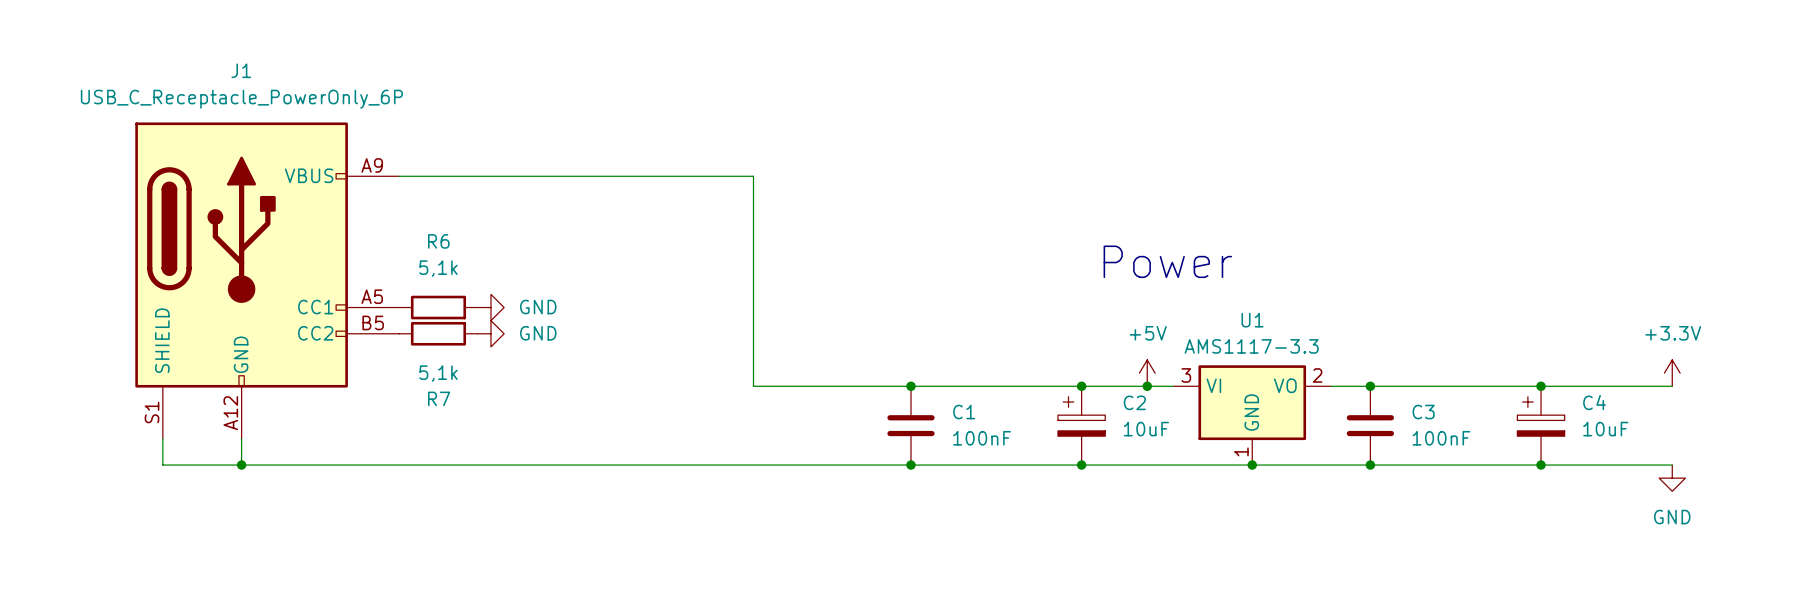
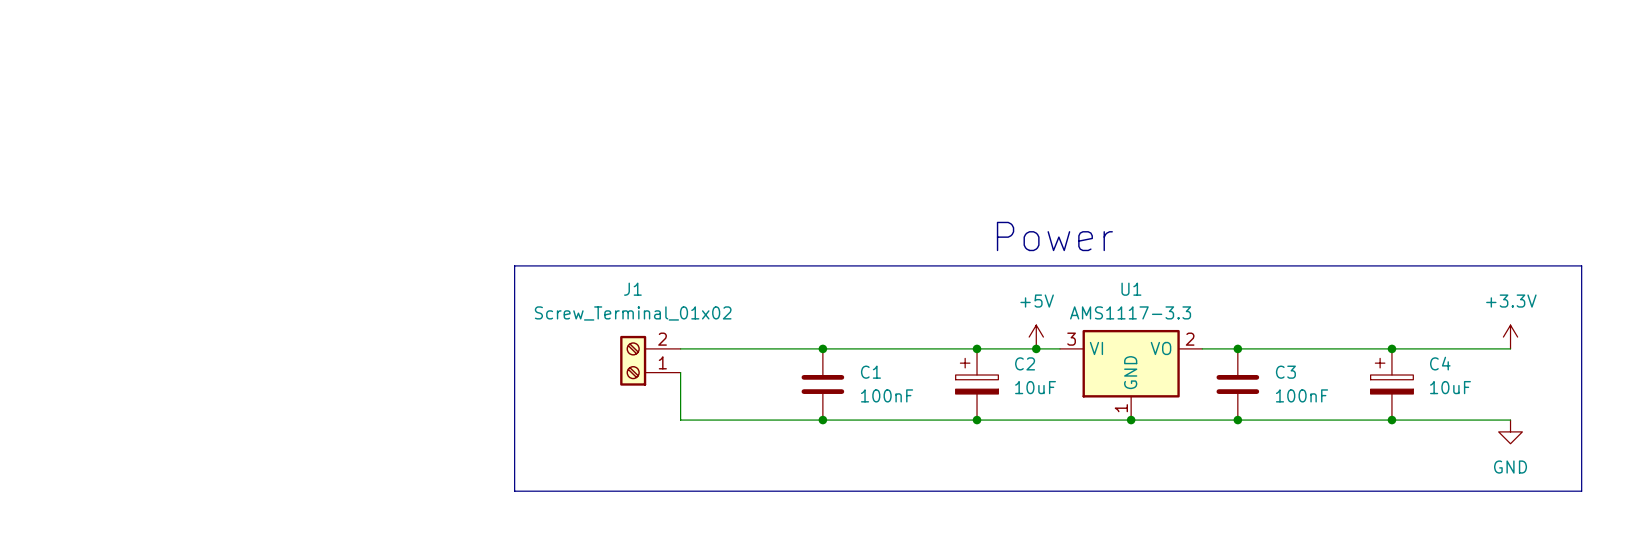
J1 name position: J1 (241, 70) -> J1 (632, 289)
J1 value: USB_C_Receptacle_PowerOnly_6P (241, 99) -> Screw_Terminal_01x02 (633, 313)
J1 symbol: [135, 122, 400, 439] -> [620, 335, 681, 386]
wire: (399, 176) (753, 176) (753, 386) -> none
line: none -> (514, 265) (1581, 265) (1581, 491) (514, 491) (514, 265)
R6: 5,1k (438, 307) -> none
power symbol: GND (490, 307) -> none
R7: 5,1k (438, 333) -> none
power symbol: GND (490, 333) -> none
wire: (162, 438) (162, 465) (753, 465) -> (680, 372) (680, 420)
wire: (241, 438) (241, 465) -> none
junction: (241, 465) -> none

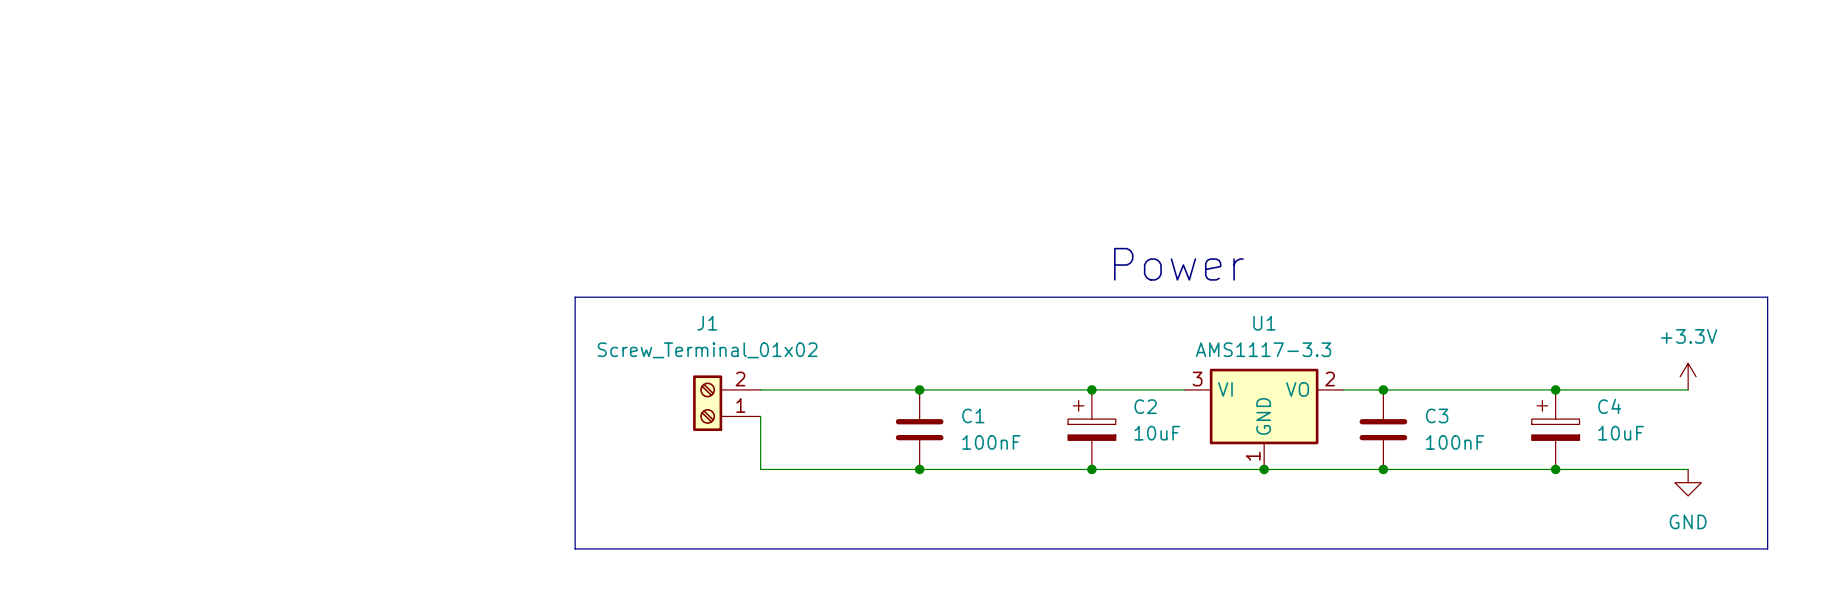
power symbol: +5V (1036, 337) -> none
junction: (1036, 348) -> none

